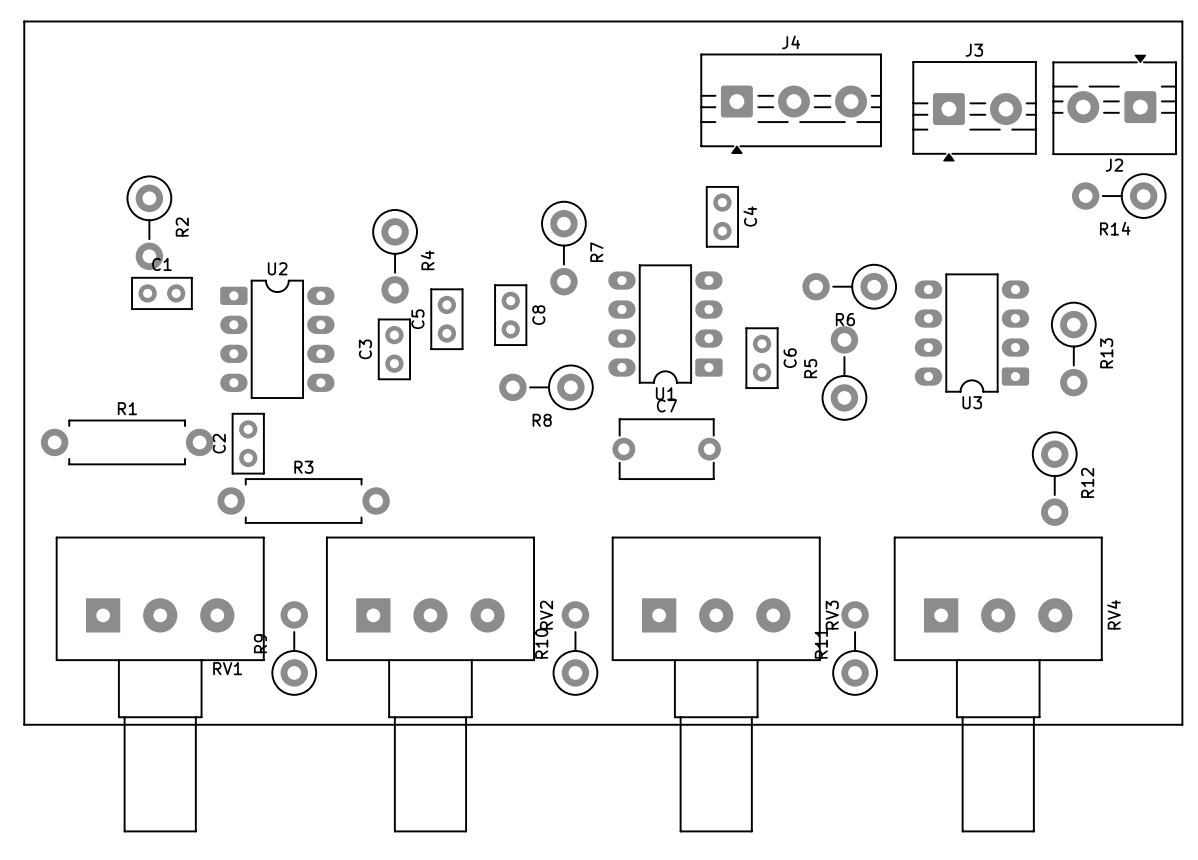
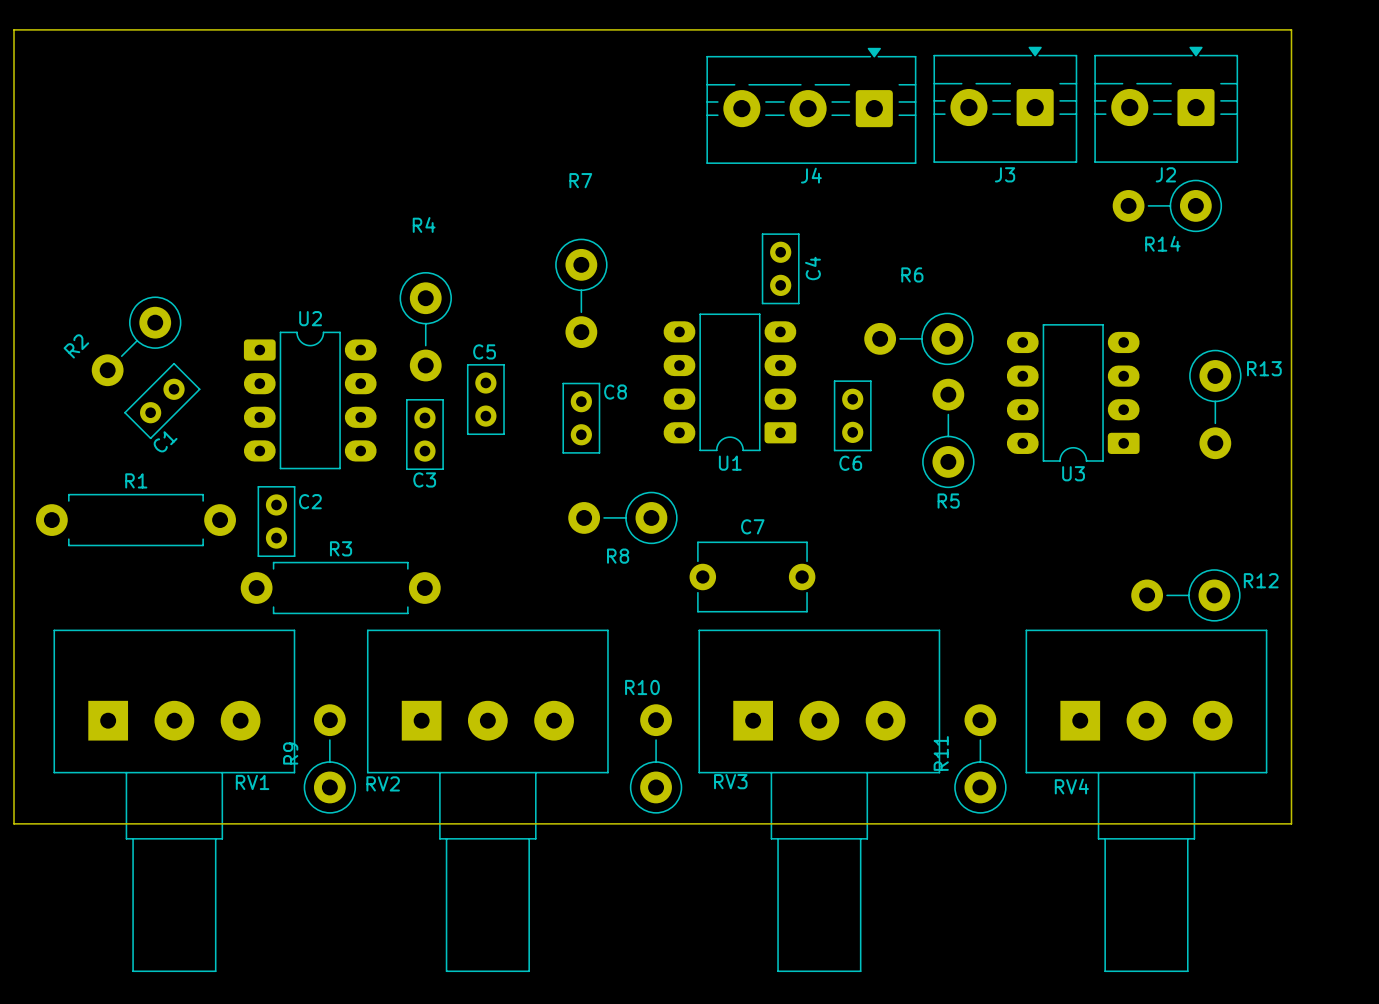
board edge: (24, 21) (1182, 21) (1182, 724) (24, 724) (24, 21) -> (14, 29) (14, 823) (1291, 823) (1291, 29) (14, 29)
J4 rotation: 0° (791, 103) -> 180° (811, 105)
J2 position: (1114, 104) -> (1166, 104)
J3 rotation: 0° (974, 111) -> 180° (1005, 104)
J3 position: (974, 111) -> (1005, 104)
R14 position: (1119, 196) -> (1167, 205)
C4 position: (722, 216) -> (780, 268)
R2 rotation: 0° (149, 222) -> 45° clockwise (136, 341)
R2 position: (149, 222) -> (136, 341)
R2 name position: R2 (182, 227) -> R2 (76, 346)
R7 position: (563, 248) -> (581, 293)
R7 name rotation: 0° (596, 252) -> 90° clockwise (580, 180)
R7 name position: R7 (596, 252) -> R7 (580, 180)
R4 position: (395, 256) -> (425, 326)
R4 name rotation: 0° (427, 260) -> 90° clockwise (424, 224)
R4 name position: R4 (427, 260) -> R4 (424, 224)
C1 name position: C1 (161, 264) -> C1 (165, 441)
R6 position: (849, 286) -> (918, 338)
C1 rotation: 0° (161, 293) -> 45° counterclockwise (162, 401)
C1 position: (161, 293) -> (162, 401)
C8 position: (510, 315) -> (581, 418)
C8 name rotation: 0° (538, 315) -> 90° clockwise (615, 392)
C5 name rotation: 0° (417, 319) -> 90° clockwise (484, 351)
C5 position: (446, 319) -> (485, 399)
R6 name position: R6 (845, 319) -> R6 (912, 274)
U1 position: (665, 324) -> (729, 382)
U3 position: (971, 333) -> (1073, 392)
C3 name rotation: 0° (365, 349) -> 90° clockwise (424, 479)
C3 name position: C3 (365, 349) -> C3 (424, 479)
C3 position: (394, 349) -> (424, 434)
R13 position: (1073, 349) -> (1215, 404)
R13 name rotation: 0° (1106, 353) -> 90° clockwise (1264, 368)
C6 position: (762, 358) -> (852, 415)
C6 name rotation: 0° (790, 358) -> 90° clockwise (850, 463)
C6 name position: C6 (790, 358) -> C6 (850, 463)
R5 name rotation: 0° (810, 368) -> 90° clockwise (948, 501)
R5 name position: R5 (810, 368) -> R5 (948, 501)
R5 position: (844, 373) -> (948, 433)
R8 position: (546, 387) -> (622, 517)
C2 name rotation: 0° (219, 443) -> 90° clockwise (310, 501)
C2 name position: C2 (219, 443) -> C2 (310, 501)
C7 position: (666, 449) -> (752, 577)
R12 rotation: 0° (1054, 478) -> 90° clockwise (1185, 595)
R12 name position: R12 (1087, 482) -> R12 (1261, 580)
RV4 name rotation: 0° (1113, 614) -> 90° clockwise (1071, 786)
RV4 name position: RV4 (1113, 614) -> RV4 (1071, 786)
RV2 name rotation: 0° (546, 615) -> 90° clockwise (383, 783)
RV2 name position: RV2 (546, 615) -> RV2 (383, 783)
RV3 name rotation: 0° (832, 615) -> 90° clockwise (730, 781)
RV3 name position: RV3 (832, 615) -> RV3 (730, 781)
R10 name rotation: 0° (541, 643) -> 90° clockwise (642, 687)
R10 name position: R10 (541, 643) -> R10 (642, 687)

